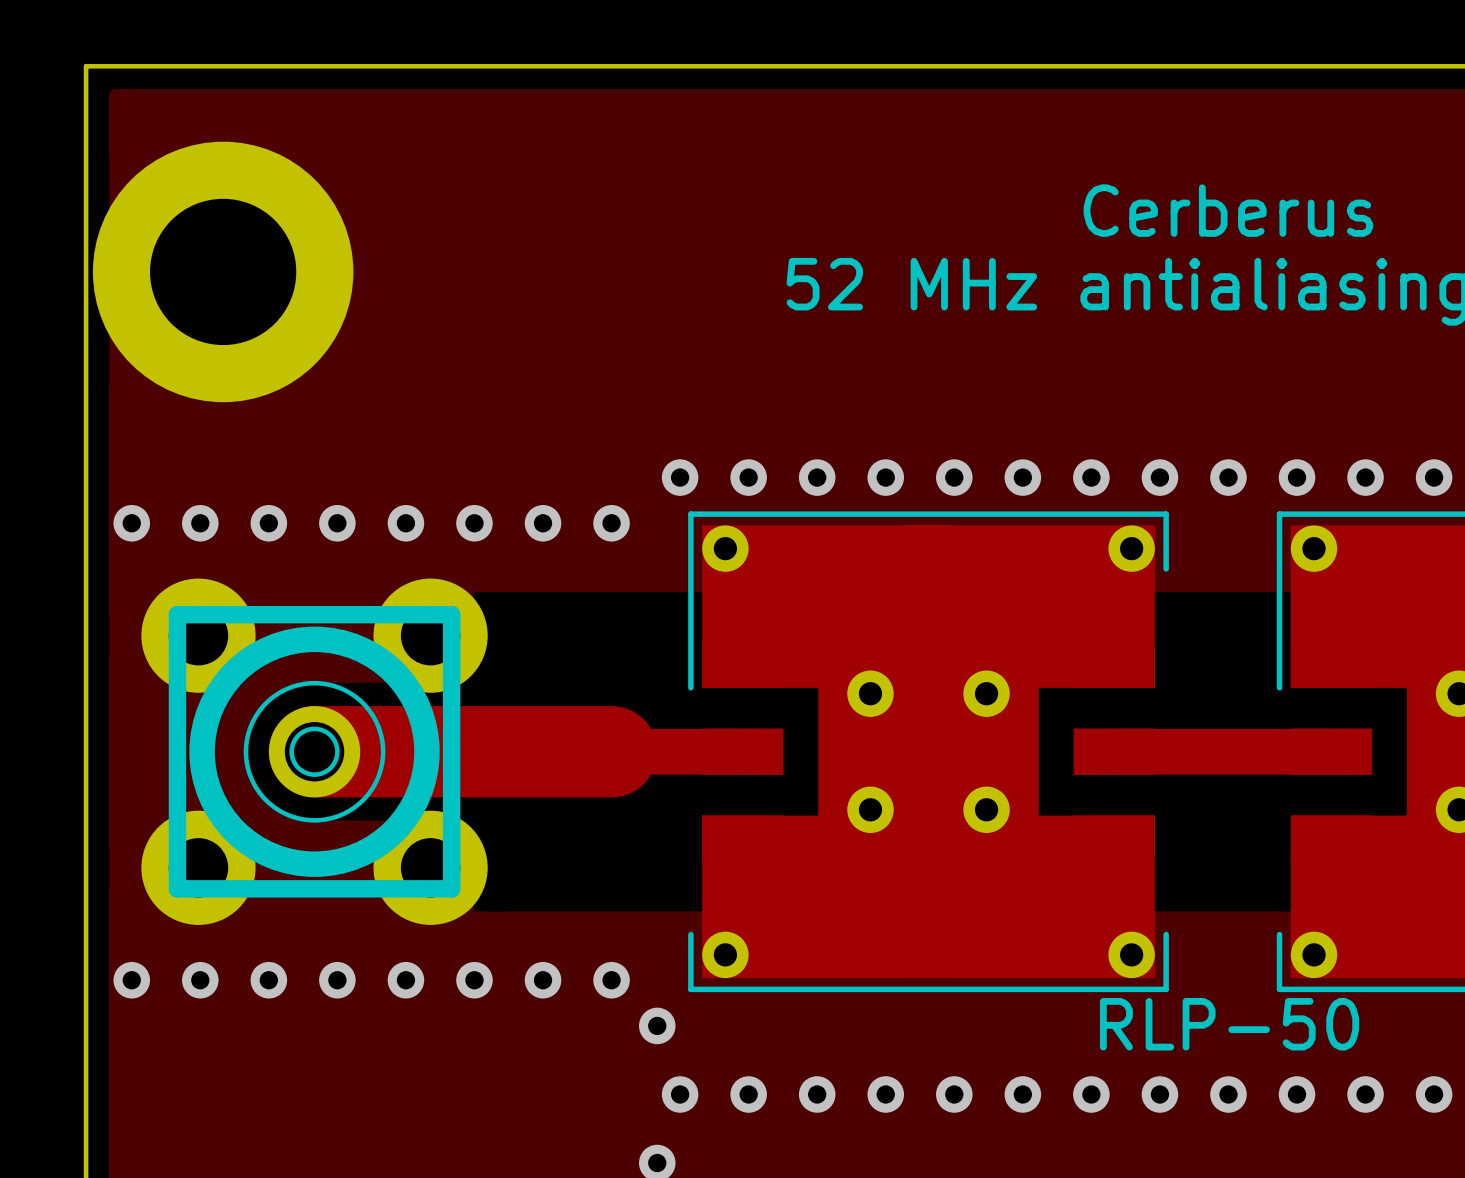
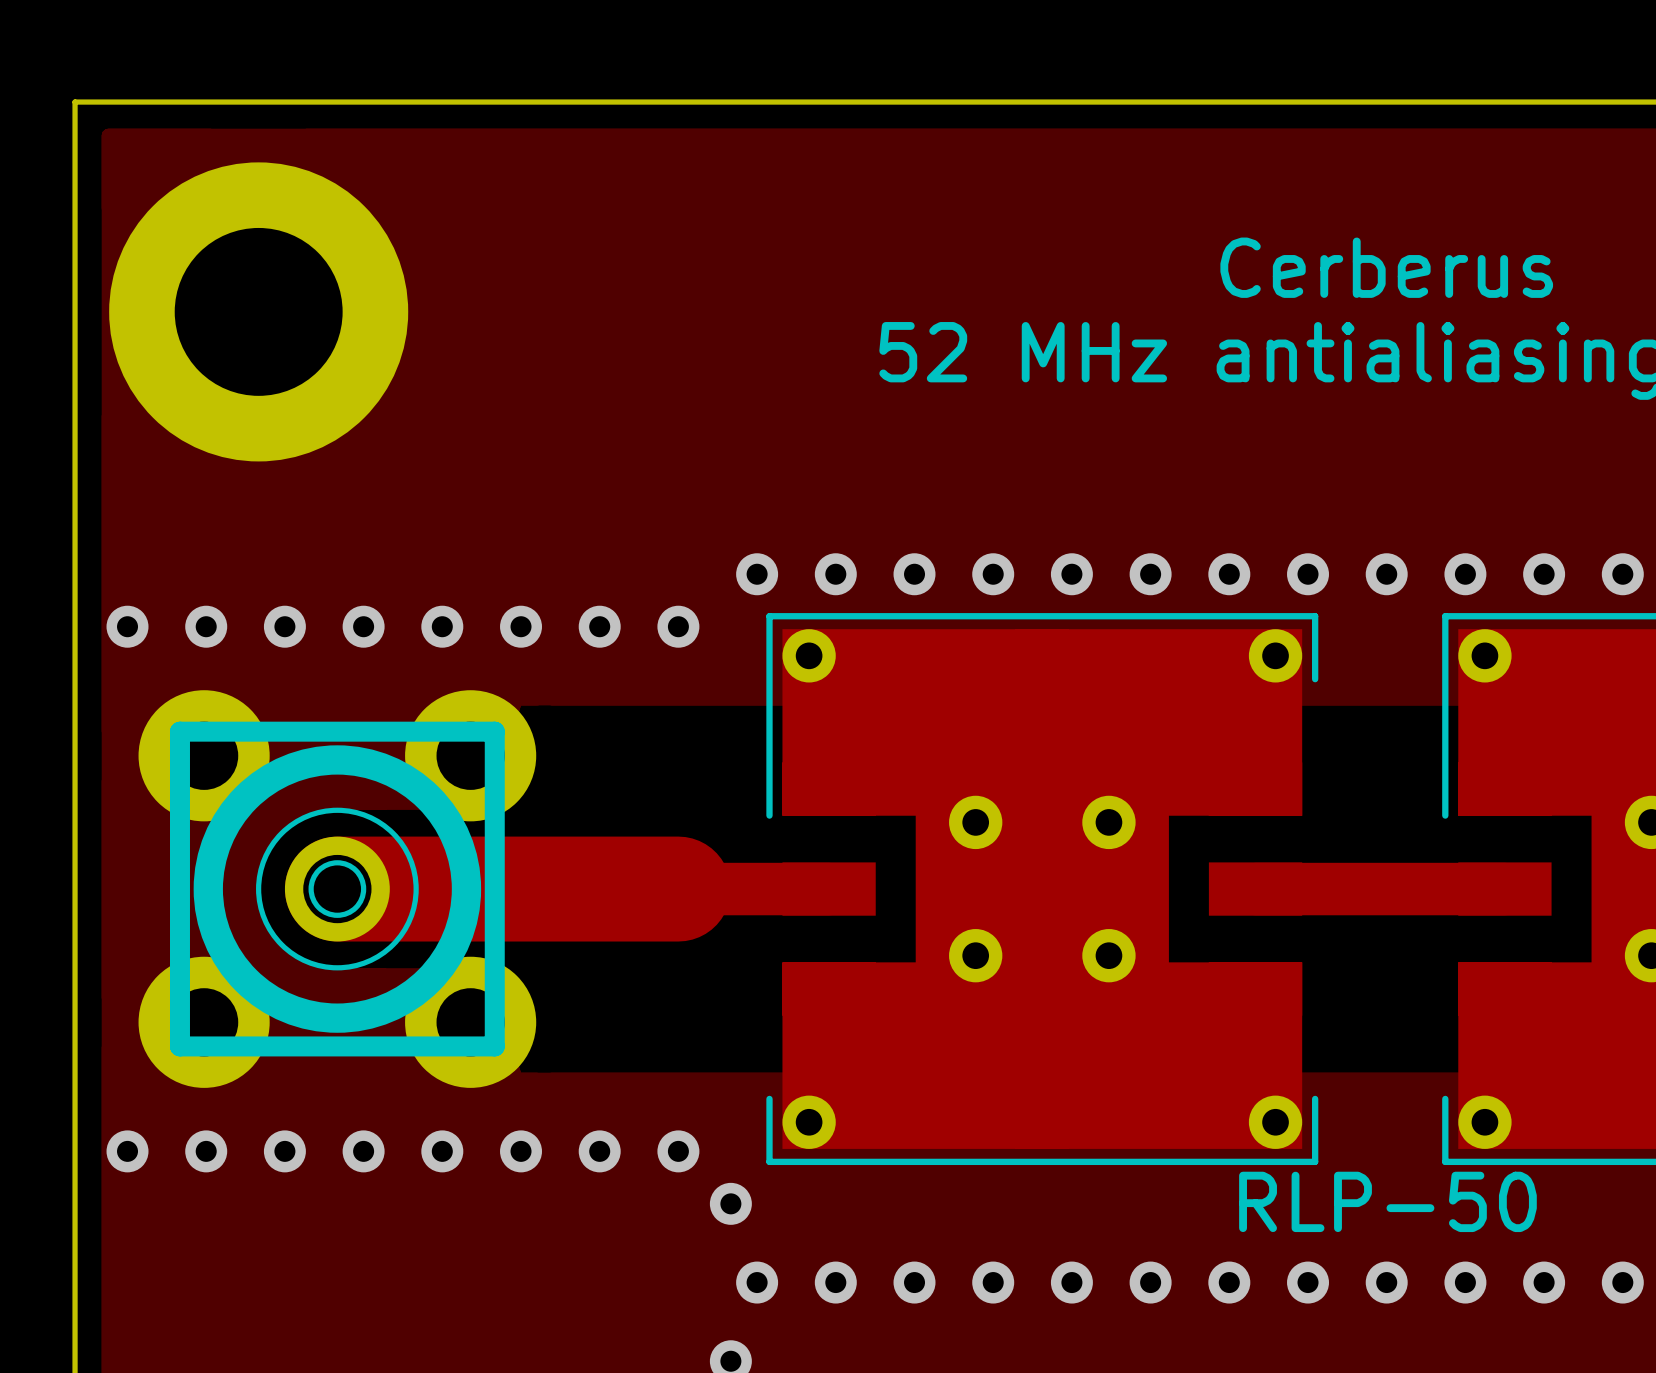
part position: (223, 271) -> (258, 311)

